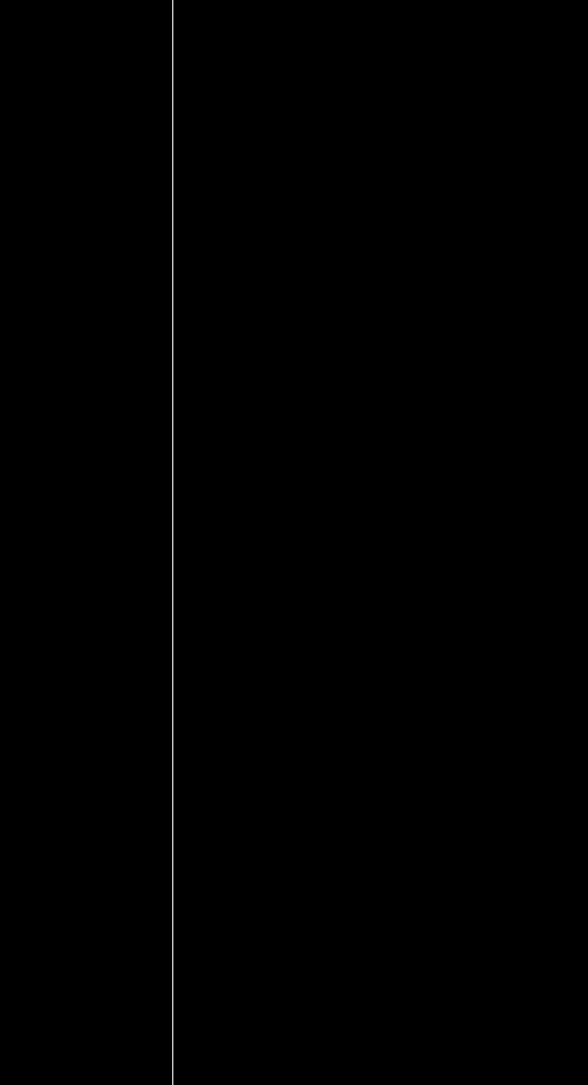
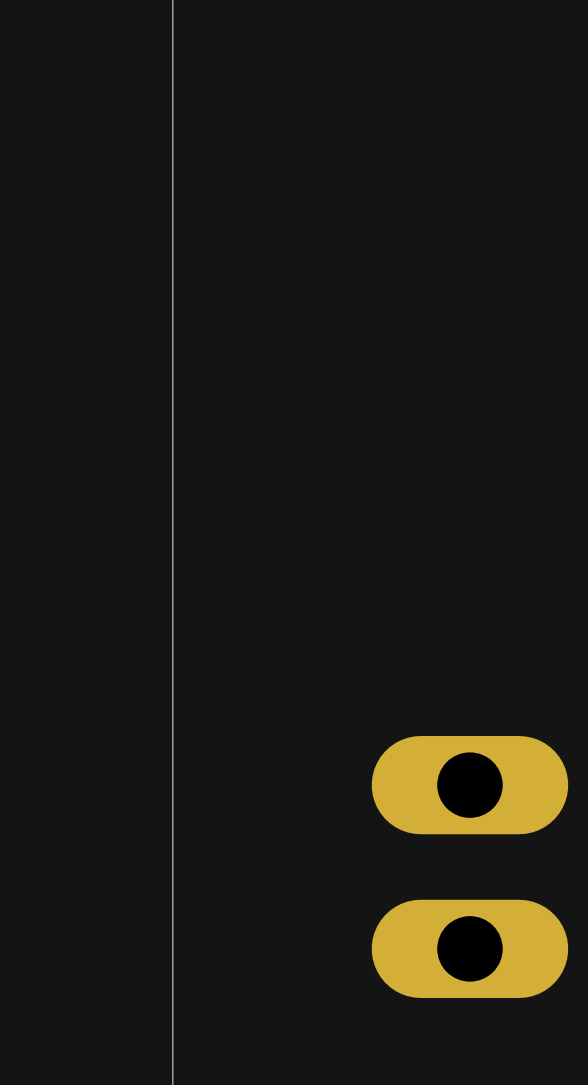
part: none -> (469, 867)

